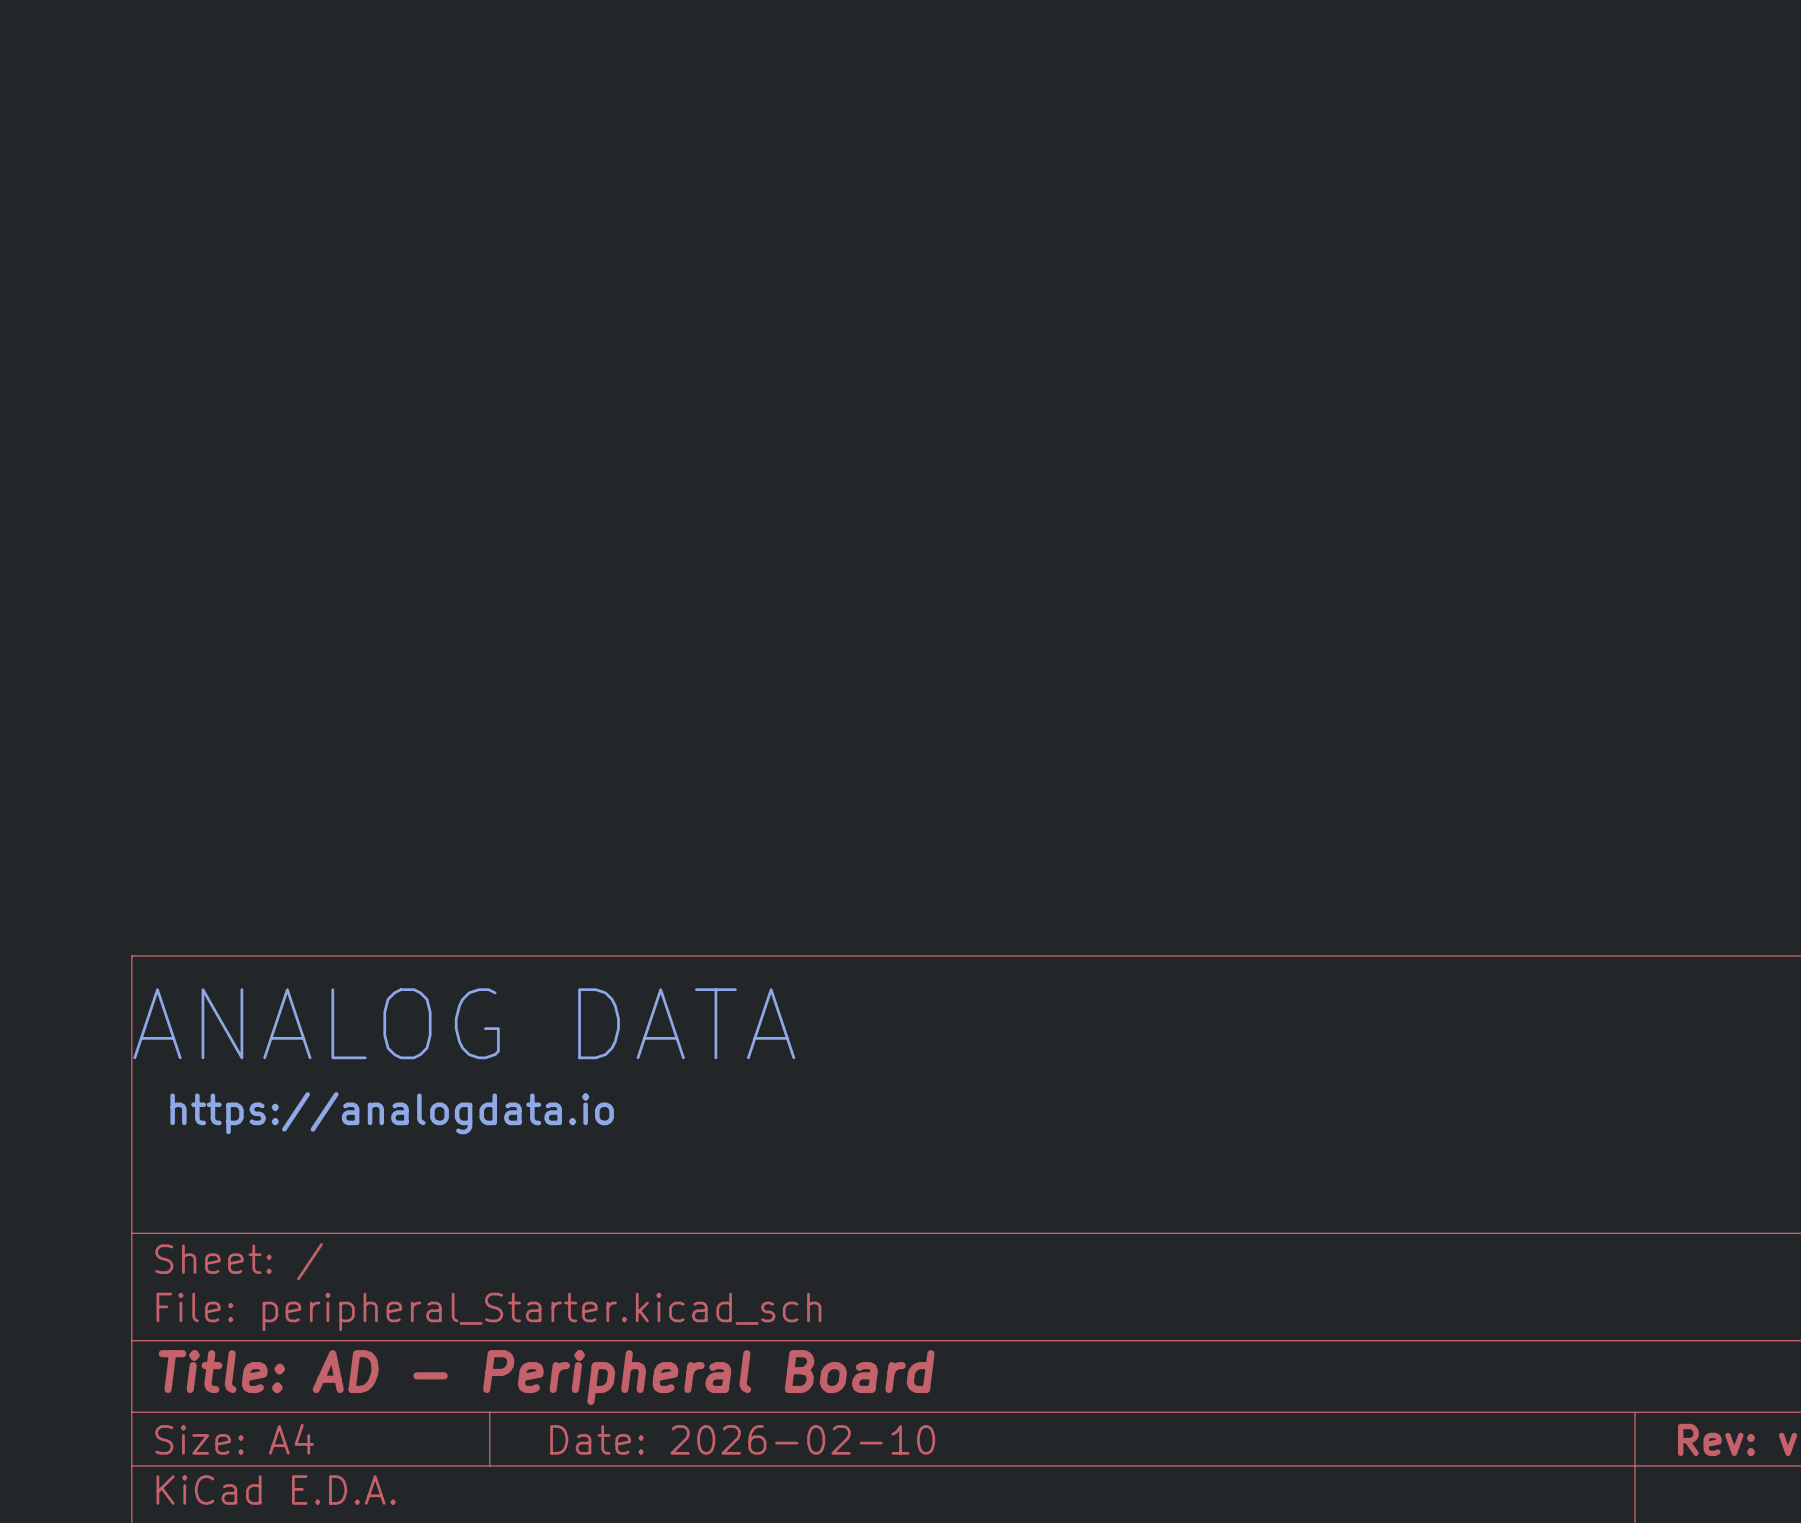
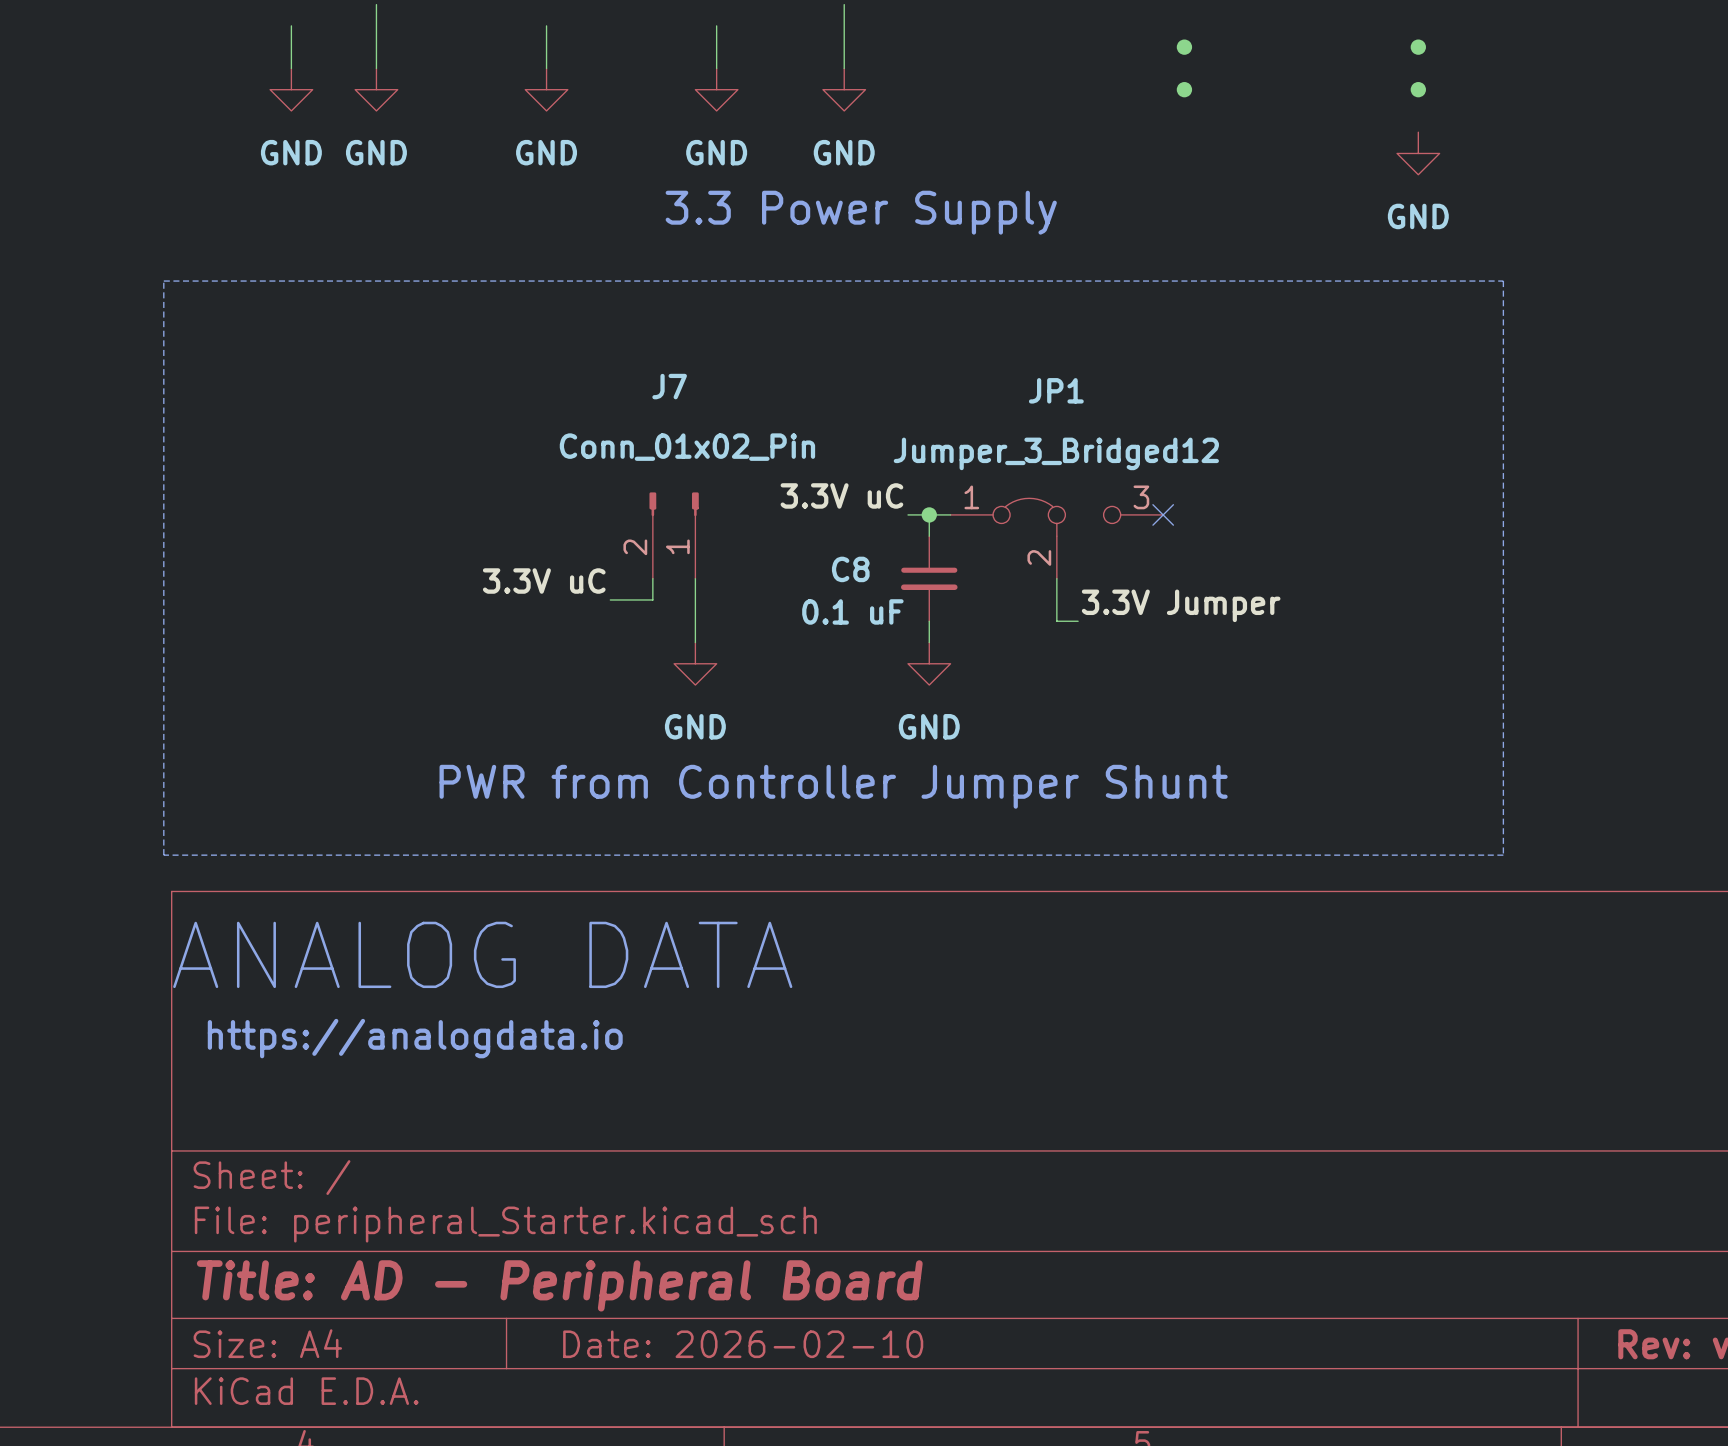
wire: none -> (376, 4) (376, 68)
wire: none -> (844, 4) (844, 68)
wire: none -> (291, 25) (291, 68)
wire: none -> (546, 25) (546, 68)
wire: none -> (716, 25) (716, 68)
junction: none -> (1184, 47)
junction: none -> (1418, 47)
power symbol: none -> GND (291, 89)
power symbol: none -> GND (376, 89)
power symbol: none -> GND (546, 89)
power symbol: none -> GND (716, 89)
power symbol: none -> GND (844, 89)
junction: none -> (1184, 89)
junction: none -> (1418, 89)
power symbol: none -> GND (1418, 153)
text: none -> 3.3 Power Supply (861, 212)
line: none -> (163, 281) (1503, 281) (1503, 855) (163, 855) (163, 281)
label: none -> 3.3V uC (841, 495)
wire: none -> (908, 514) (950, 514)
wire: none -> (929, 514) (929, 536)
junction: none -> (929, 514)
no-connect mark: none -> (1163, 514)
J7: none -> Conn_01x02_Pin (674, 535)
JP1: none -> Jumper_3_Bridged12 (1056, 538)
wire: none -> (652, 578) (652, 599) (610, 599)
wire: none -> (695, 578) (695, 642)
C8: none -> 0.1 uF (929, 578)
wire: none -> (1056, 578) (1056, 621) (1078, 621)
label: none -> 3.3V uC (544, 581)
label: none -> 3.3V Jumper (1181, 605)
wire: none -> (929, 621) (929, 642)
power symbol: none -> GND (695, 663)
power symbol: none -> GND (929, 663)
text: none -> PWR from Controller Jumper Shunt (833, 786)

